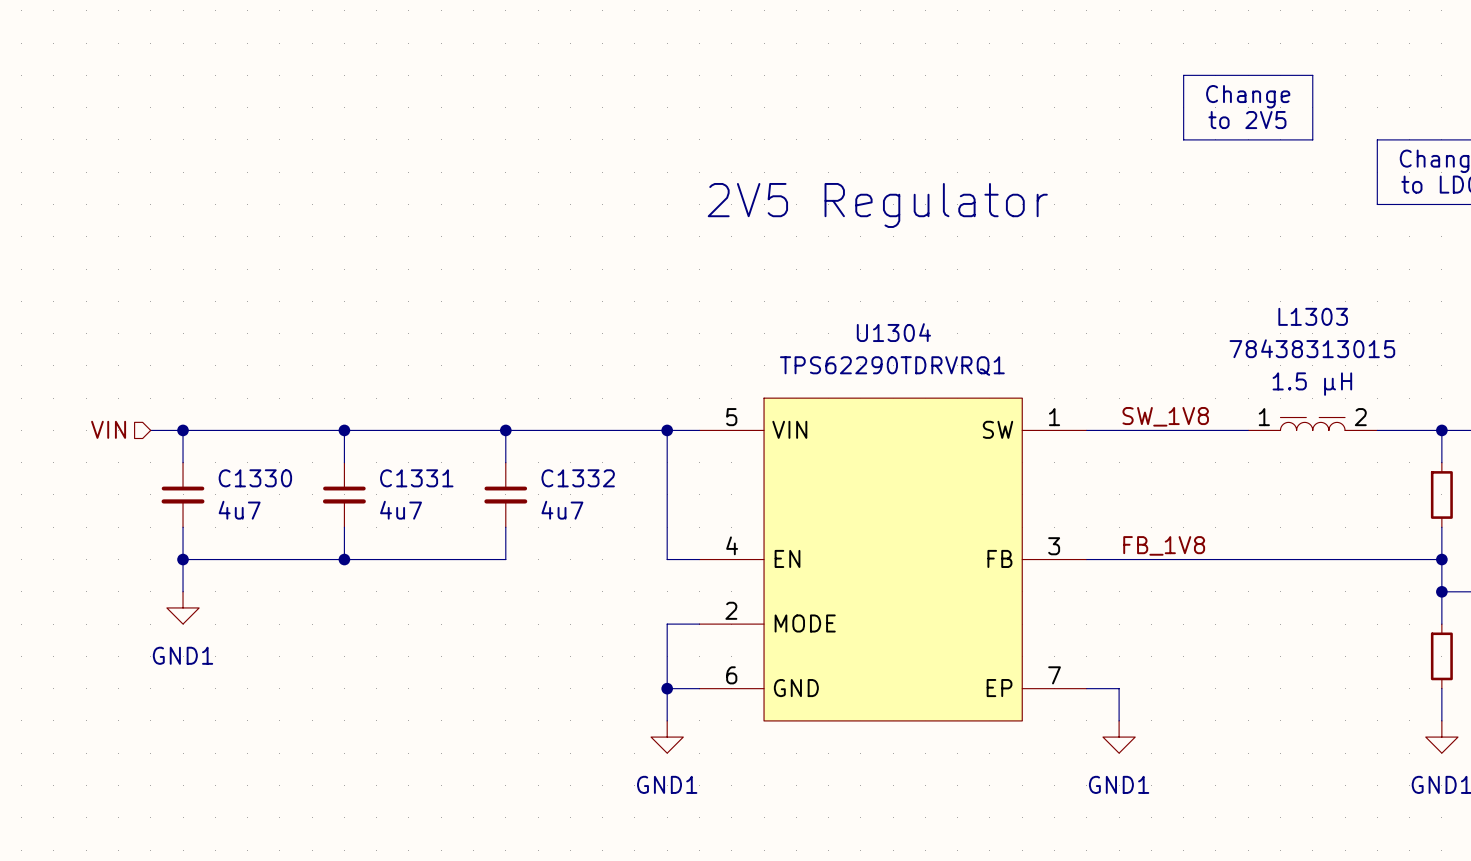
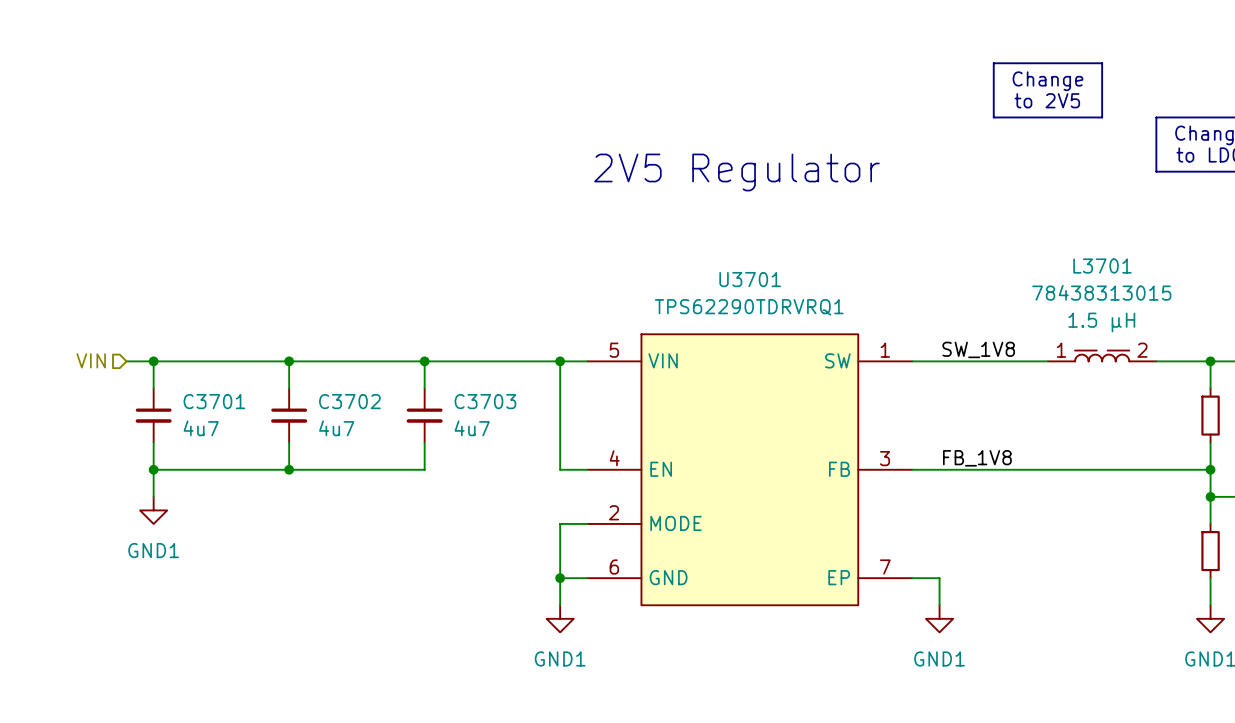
L1303 name: L1303 (1313, 316) -> L3701 (1102, 266)
U1304 name: U1304 (893, 332) -> U3701 (750, 279)
C1330 name: C1330 (255, 478) -> C3701 (214, 401)
C1331 name: C1331 (416, 478) -> C3702 (349, 401)
C1332 name: C1332 (578, 478) -> C3703 (485, 401)

